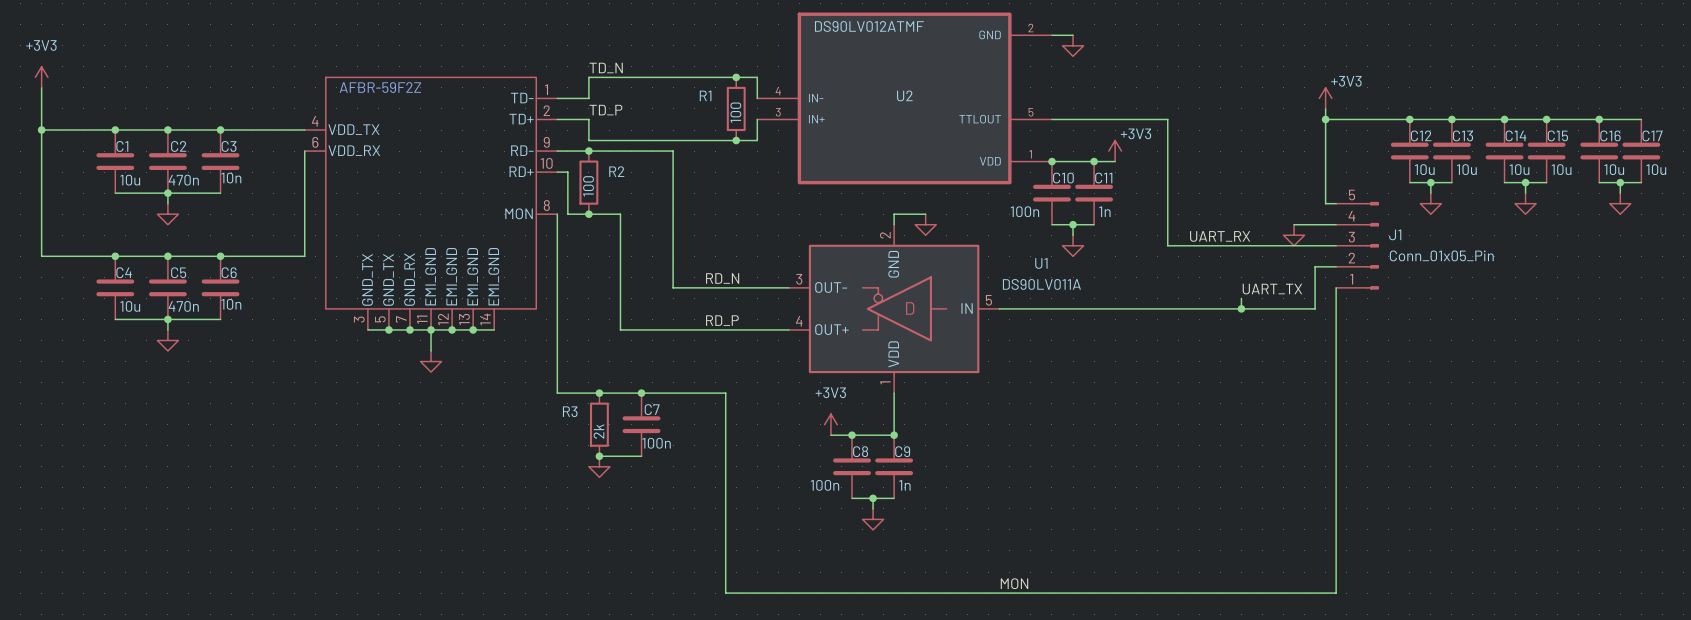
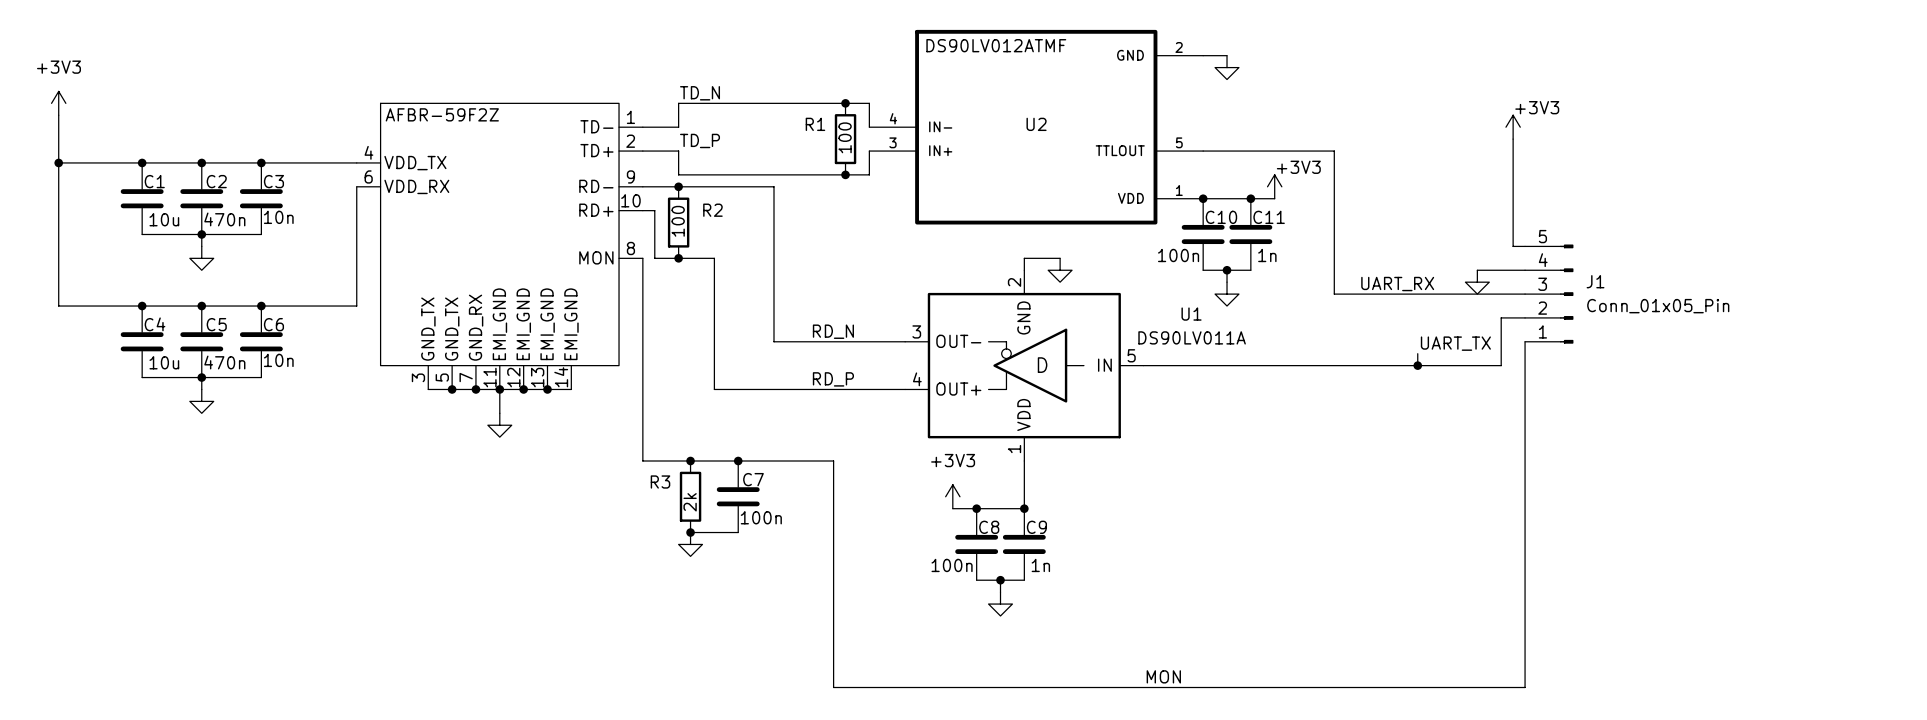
wire: (1325, 119) (1641, 119) -> none
junction: (1325, 119) -> none
junction: (1409, 119) -> none
junction: (1451, 119) -> none
junction: (1504, 119) -> none
junction: (1546, 119) -> none
junction: (1599, 119) -> none
C12: 10u (1409, 151) -> none
C13: 10u (1451, 151) -> none
C14: 10u (1504, 151) -> none
C15: 10u (1546, 151) -> none
C16: 10u (1599, 151) -> none
C17: 10u (1641, 151) -> none
wire: (1409, 182) (1451, 182) -> none
wire: (1430, 182) (1430, 193) -> none
junction: (1430, 182) -> none
wire: (1504, 182) (1546, 182) -> none
wire: (1525, 182) (1525, 193) -> none
junction: (1525, 182) -> none
wire: (1599, 182) (1641, 182) -> none
wire: (1620, 182) (1620, 193) -> none
junction: (1620, 182) -> none
power symbol: (1430, 203) -> none
power symbol: (1525, 203) -> none
power symbol: (1620, 203) -> none

